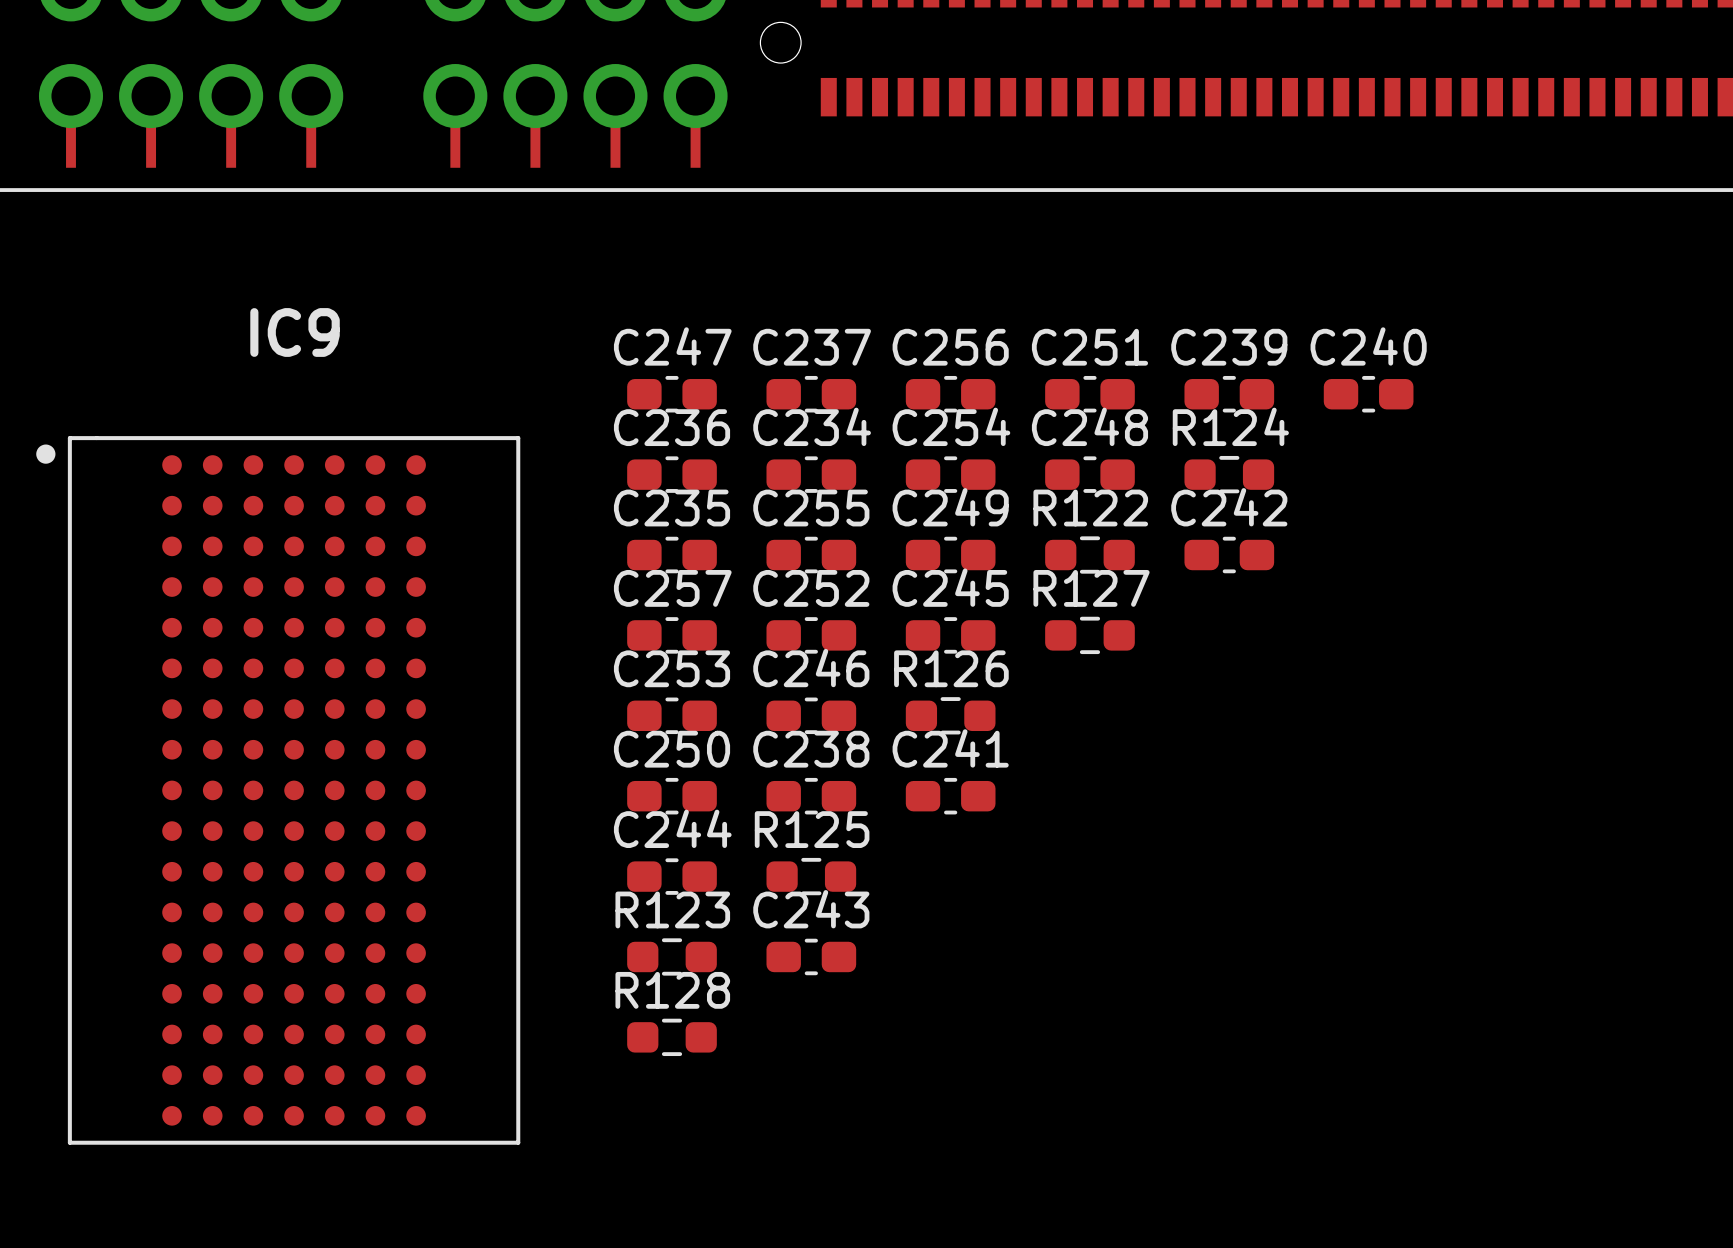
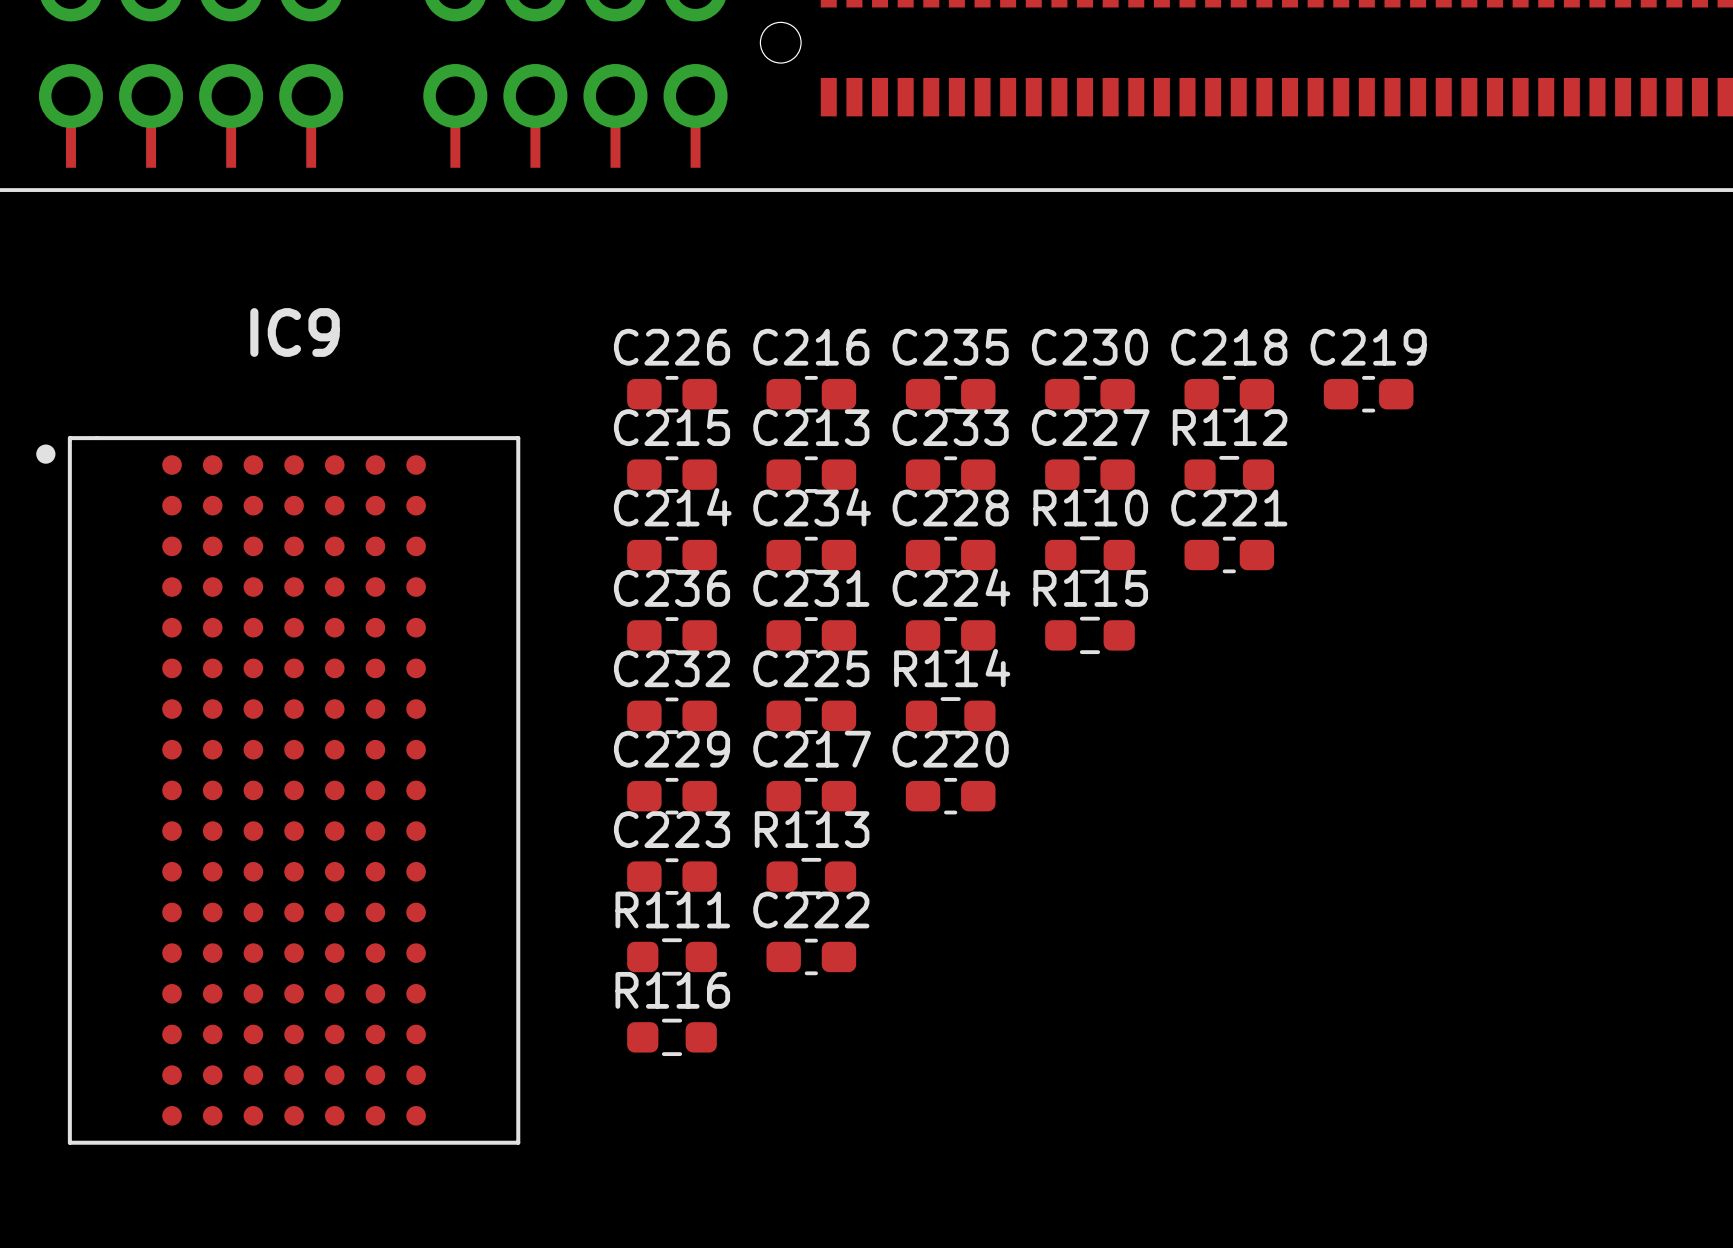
C247 name: C247 (672, 346) -> C226 (672, 347)
C240 name: C240 (1368, 346) -> C219 (1368, 347)
C237 name: C237 (812, 347) -> C216 (811, 347)
C256 name: C256 (950, 347) -> C235 (950, 347)
C251 name: C251 (1089, 347) -> C230 (1089, 347)
C239 name: C239 (1229, 347) -> C218 (1229, 347)
C234 name: C234 (812, 426) -> C213 (811, 427)
C254 name: C254 (951, 426) -> C233 (950, 427)
C248 name: C248 (1089, 426) -> C227 (1090, 427)
R124 name: R124 (1230, 426) -> R112 (1230, 427)
C236 name: C236 (672, 427) -> C215 (672, 427)
C249 name: C249 (950, 507) -> C228 (950, 508)
C242 name: C242 (1229, 507) -> C221 (1229, 508)
C235 name: C235 (672, 508) -> C214 (672, 507)
C255 name: C255 (811, 508) -> C234 (812, 507)
R122 name: R122 (1090, 508) -> R110 (1090, 508)
C245 name: C245 (950, 587) -> C224 (951, 587)
C257 name: C257 (672, 588) -> C236 (672, 588)
C252 name: C252 (811, 588) -> C231 (811, 588)
R127 name: R127 (1091, 588) -> R115 (1090, 588)
C253 name: C253 (672, 668) -> C232 (672, 668)
C246 name: C246 (811, 668) -> C225 (811, 668)
R126 name: R126 (951, 668) -> R114 (952, 668)
C241 name: C241 (950, 748) -> C220 (950, 749)
C250 name: C250 (672, 749) -> C229 (672, 749)
C238 name: C238 (811, 749) -> C217 (812, 749)
C244 name: C244 (672, 828) -> C223 (672, 829)
R125 name: R125 (812, 829) -> R113 (812, 829)
R123 name: R123 (672, 909) -> R111 (672, 909)
C243 name: C243 (811, 909) -> C222 (811, 909)
R128 name: R128 (672, 990) -> R116 (672, 990)

